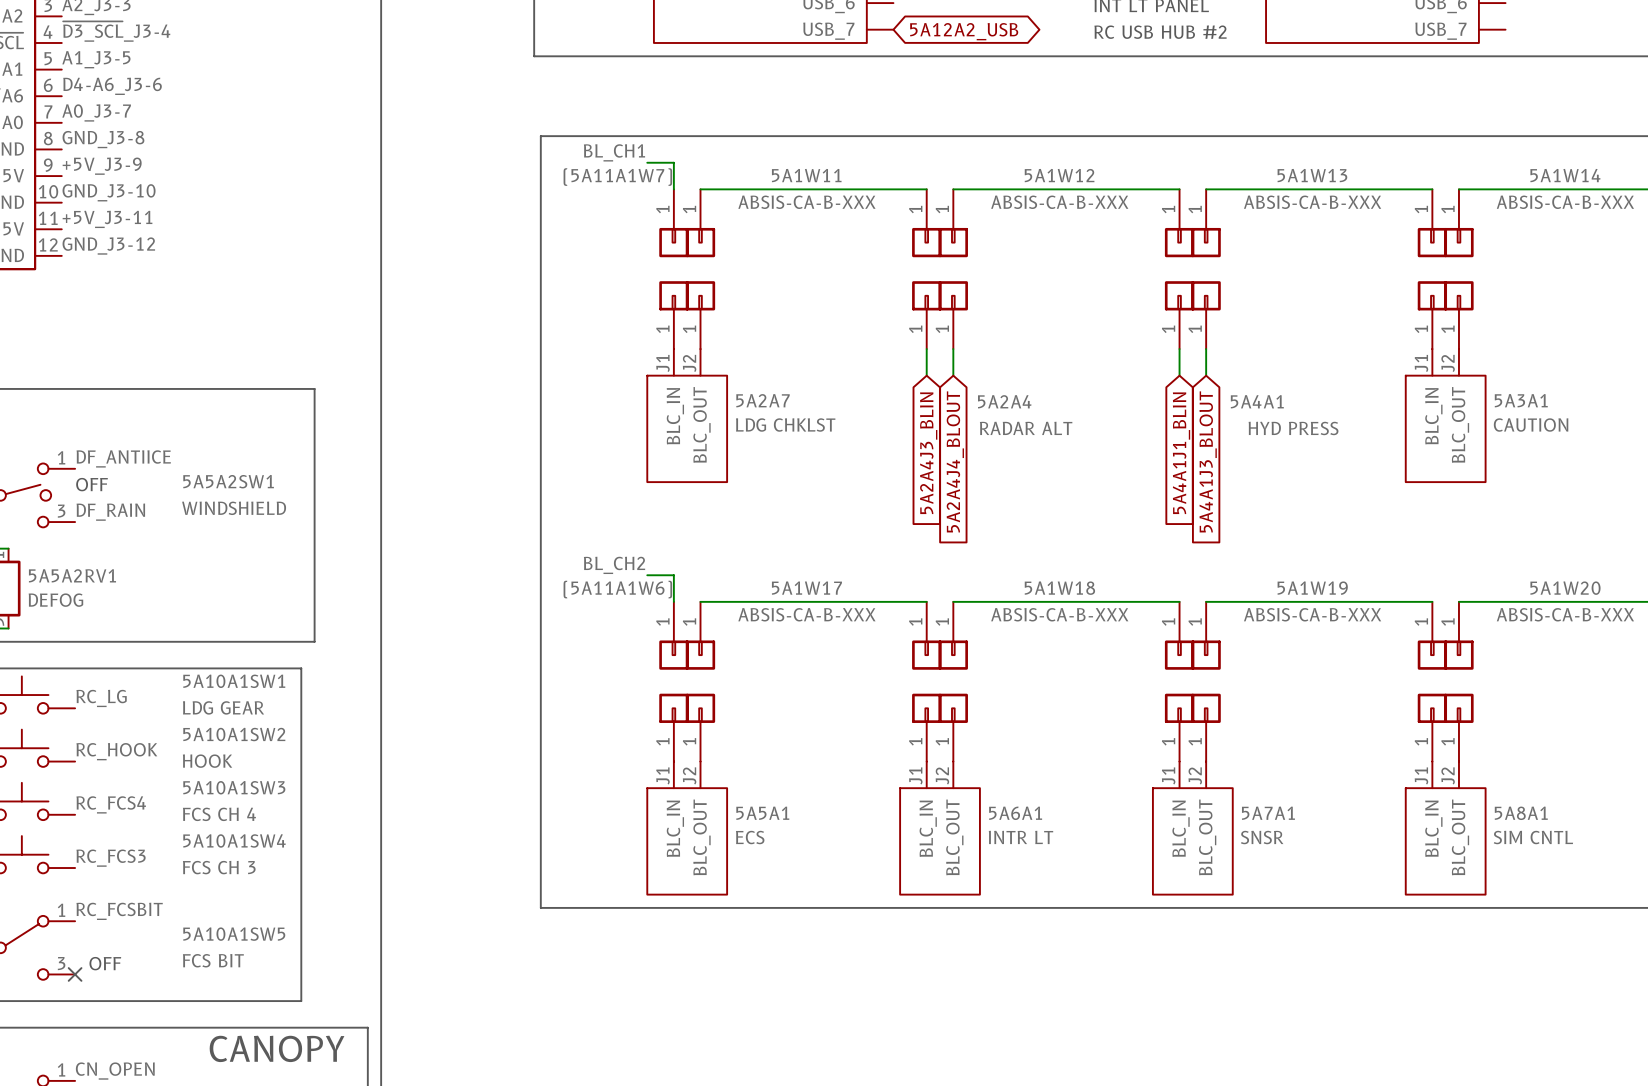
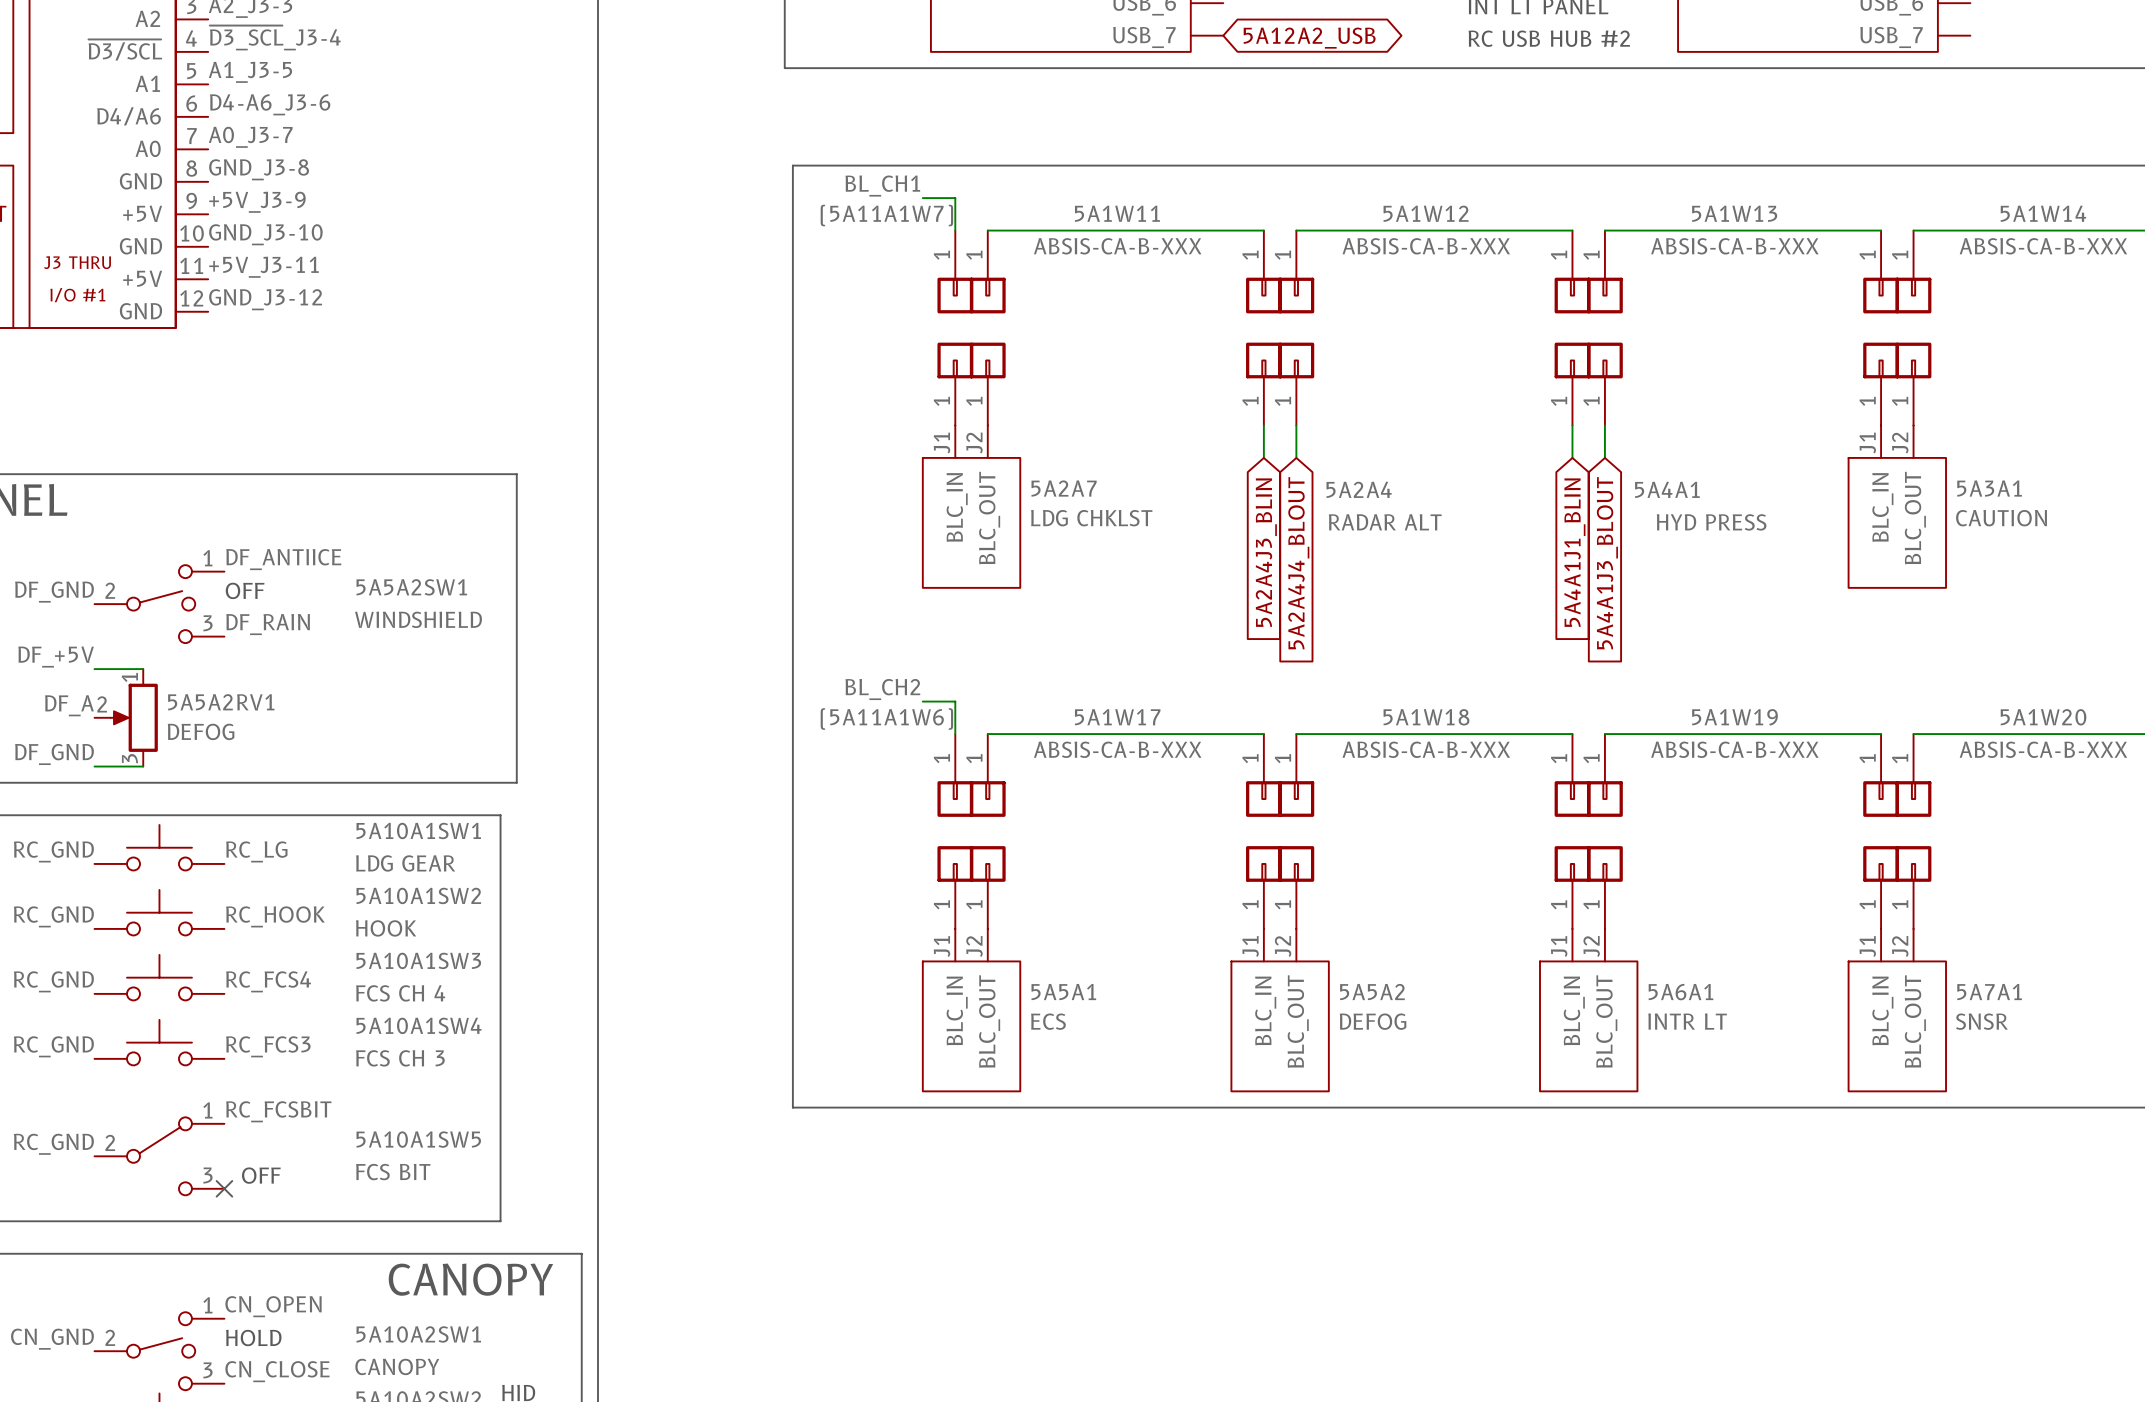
5A6A1 name: 5A6A1 (1015, 813) -> 5A5A2 (1372, 992)
5A7A1 name: 5A7A1 (1268, 813) -> 5A6A1 (1680, 992)
5A8A1 name: 5A8A1 (1521, 813) -> 5A7A1 (1989, 992)
5A6A1 value: INTR LT (1020, 837) -> DEFOG (1373, 1021)
5A7A1 value: SNSR (1262, 837) -> INTR LT (1687, 1021)
5A8A1 value: SIM CNTL (1533, 837) -> SNSR (1981, 1021)

